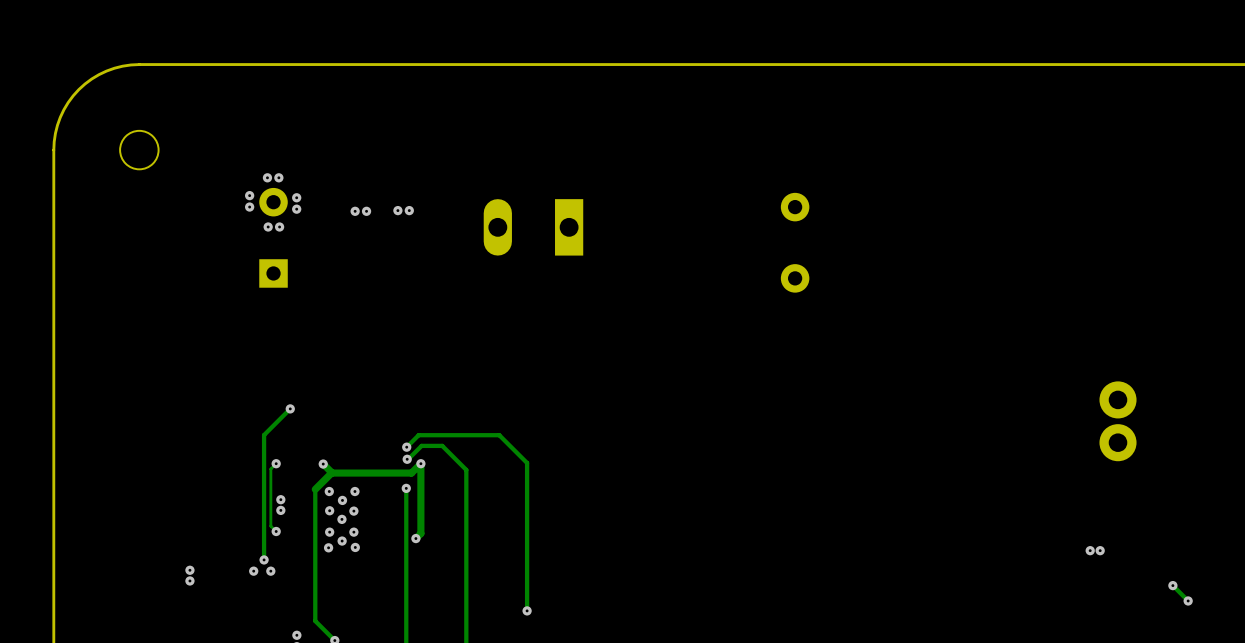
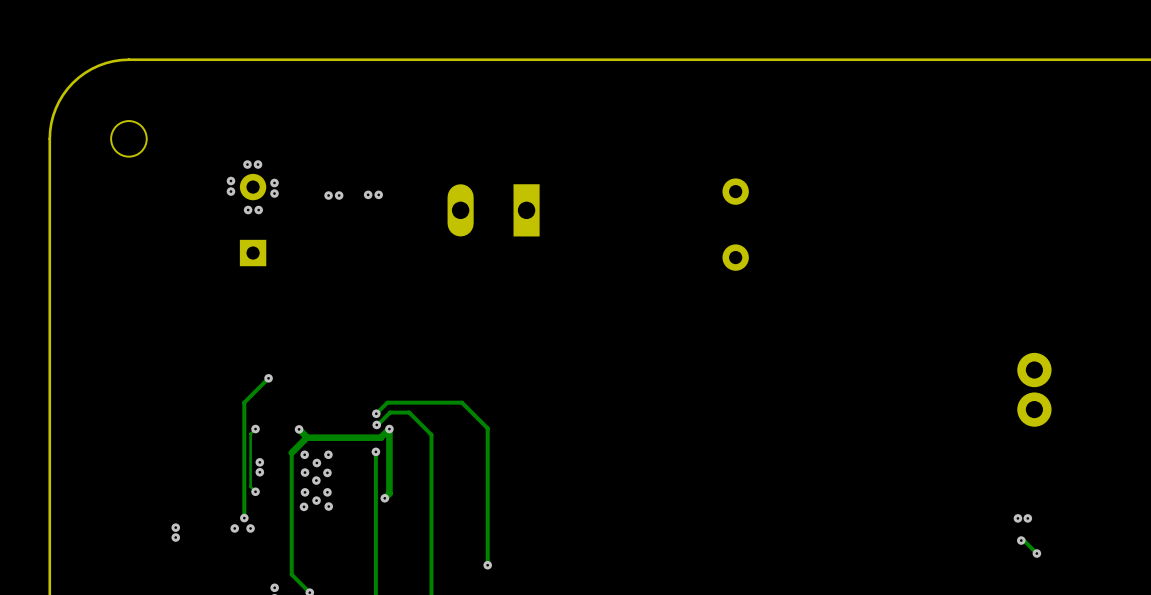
via: (1090, 550) -> none
via: (1100, 550) -> none
via: none -> (1017, 518)
via: none -> (1027, 518)
track: none -> (1021, 540) (1023, 540) (1036, 553)
via: none -> (1021, 540)
track: (1172, 585) (1188, 600) -> none
via: (1172, 585) -> none
via: none -> (1036, 553)
via: (1188, 600) -> none

